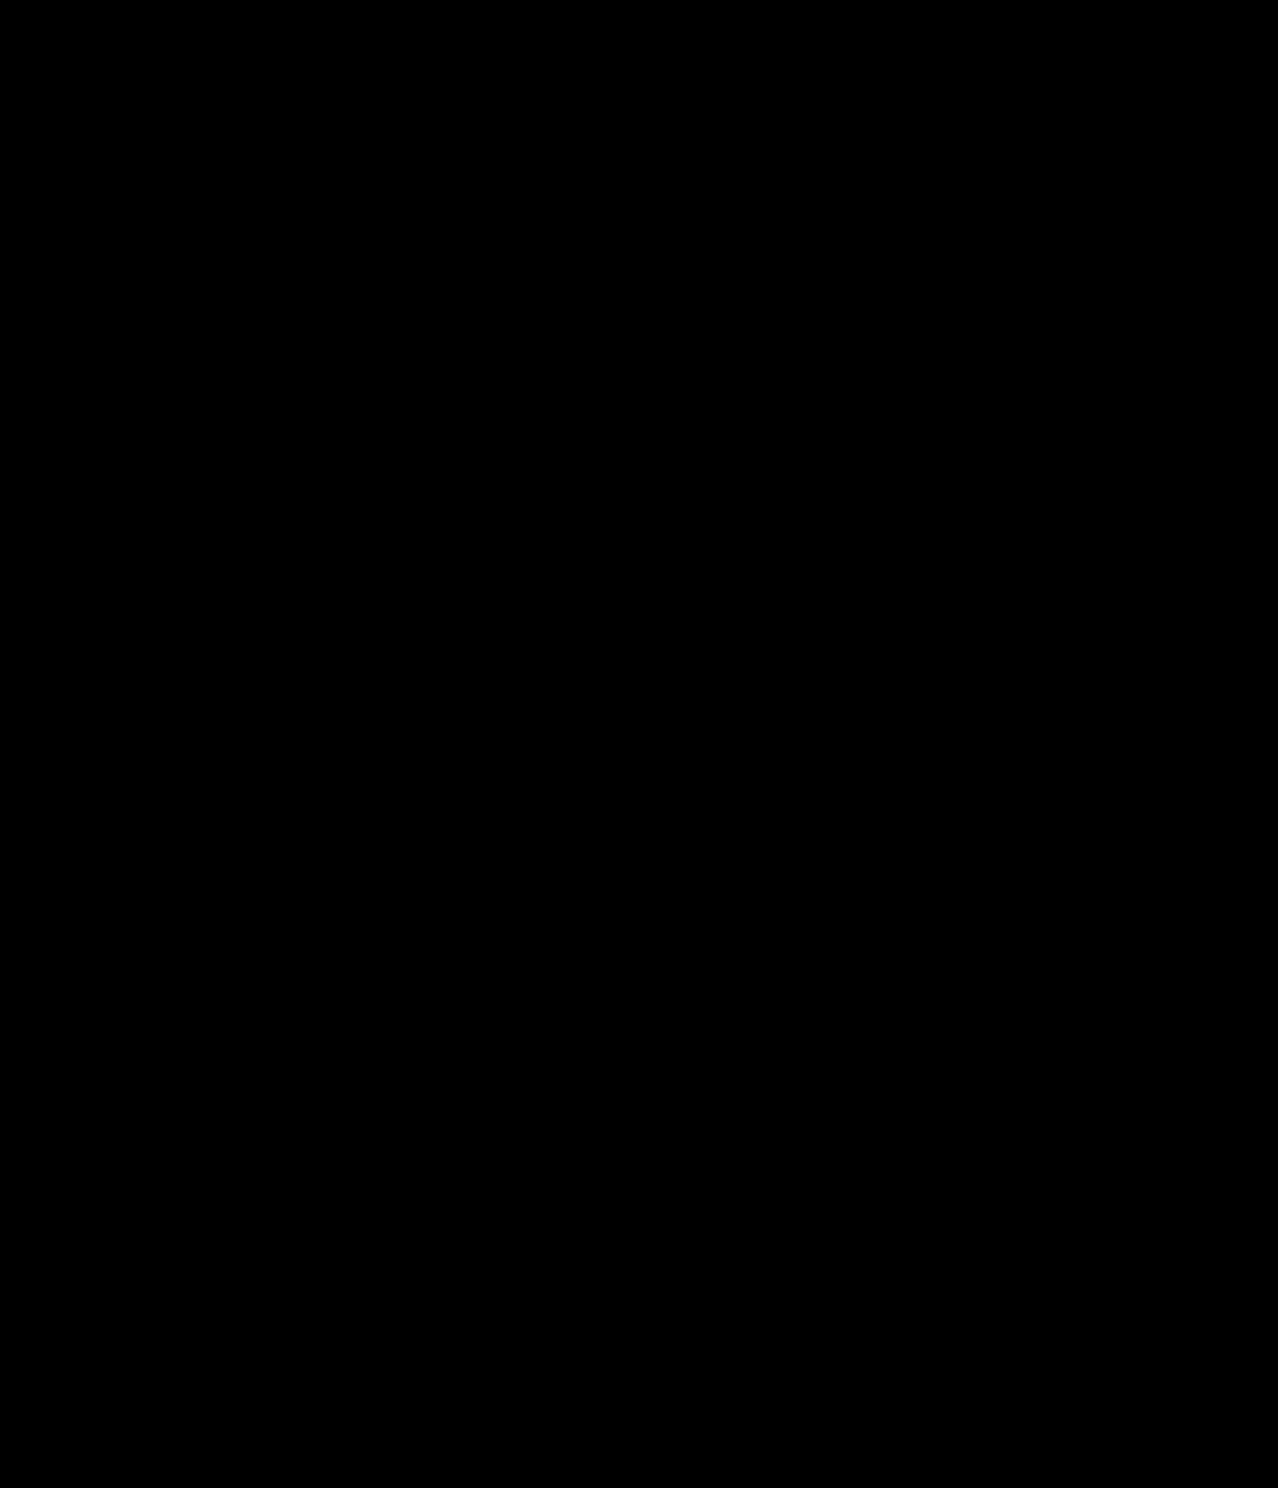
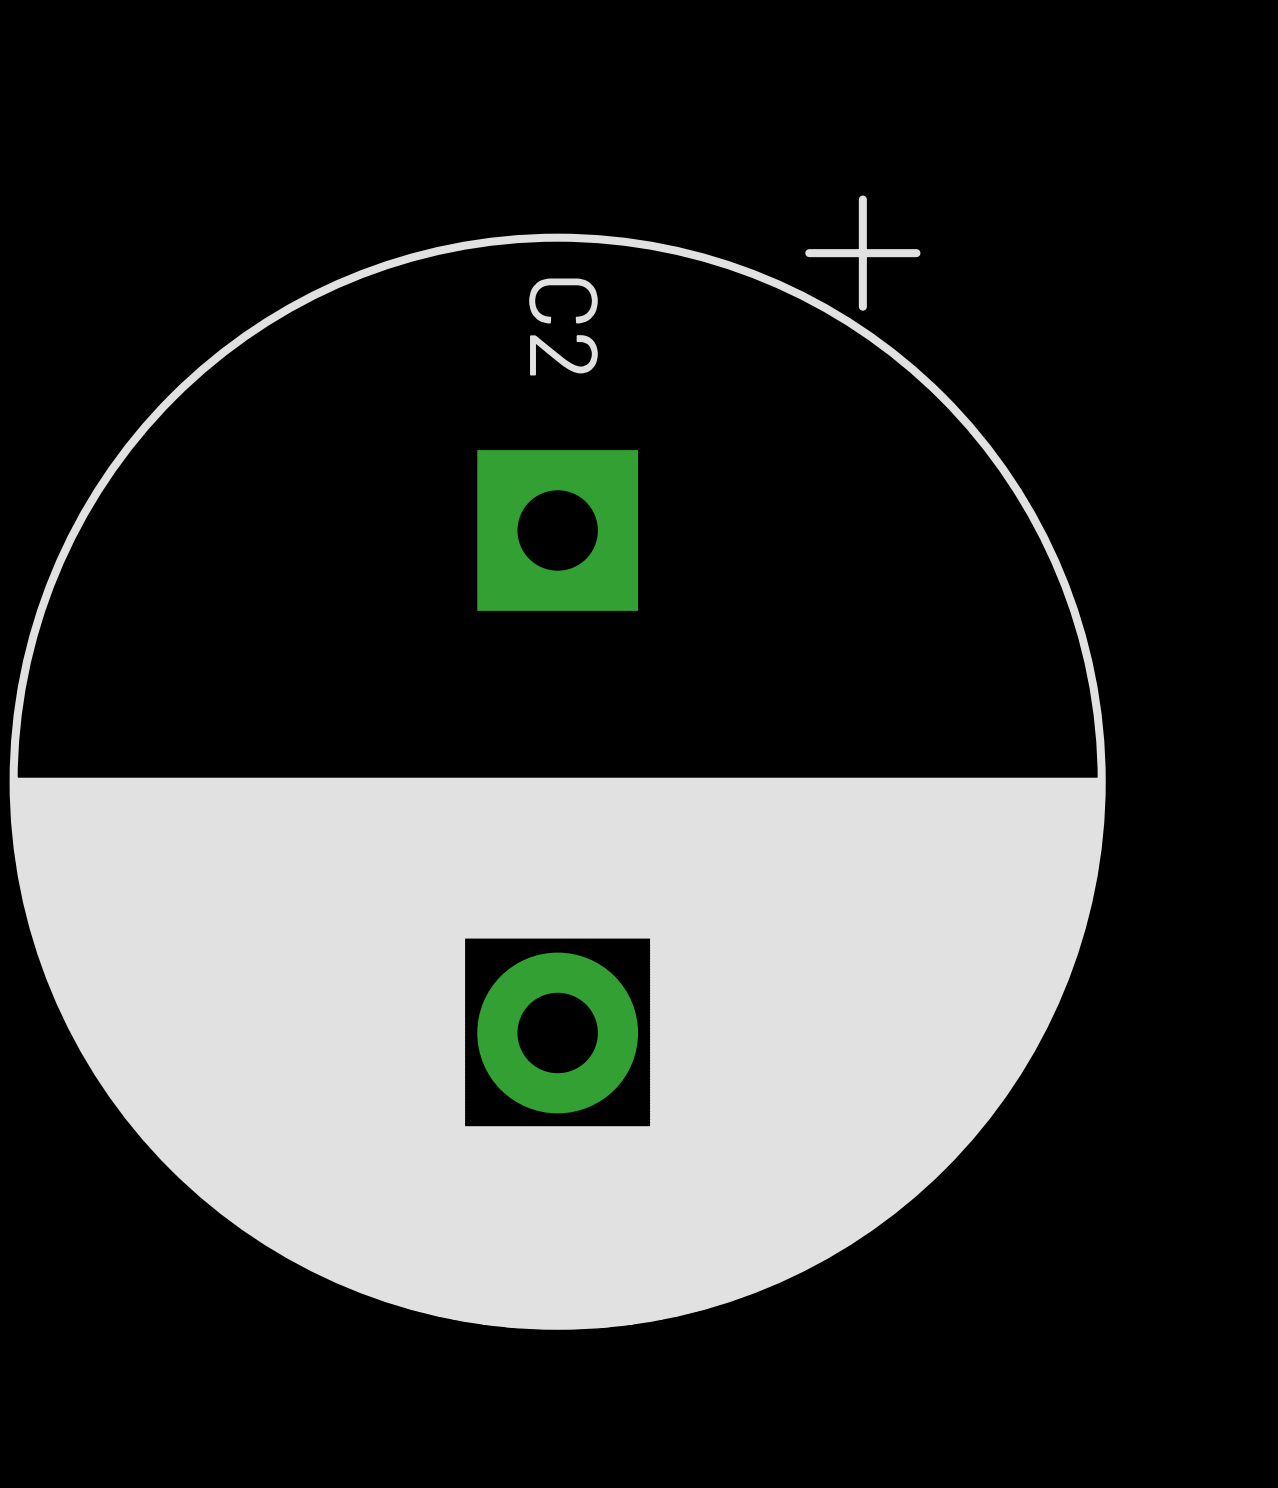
C2: none -> (557, 762)

